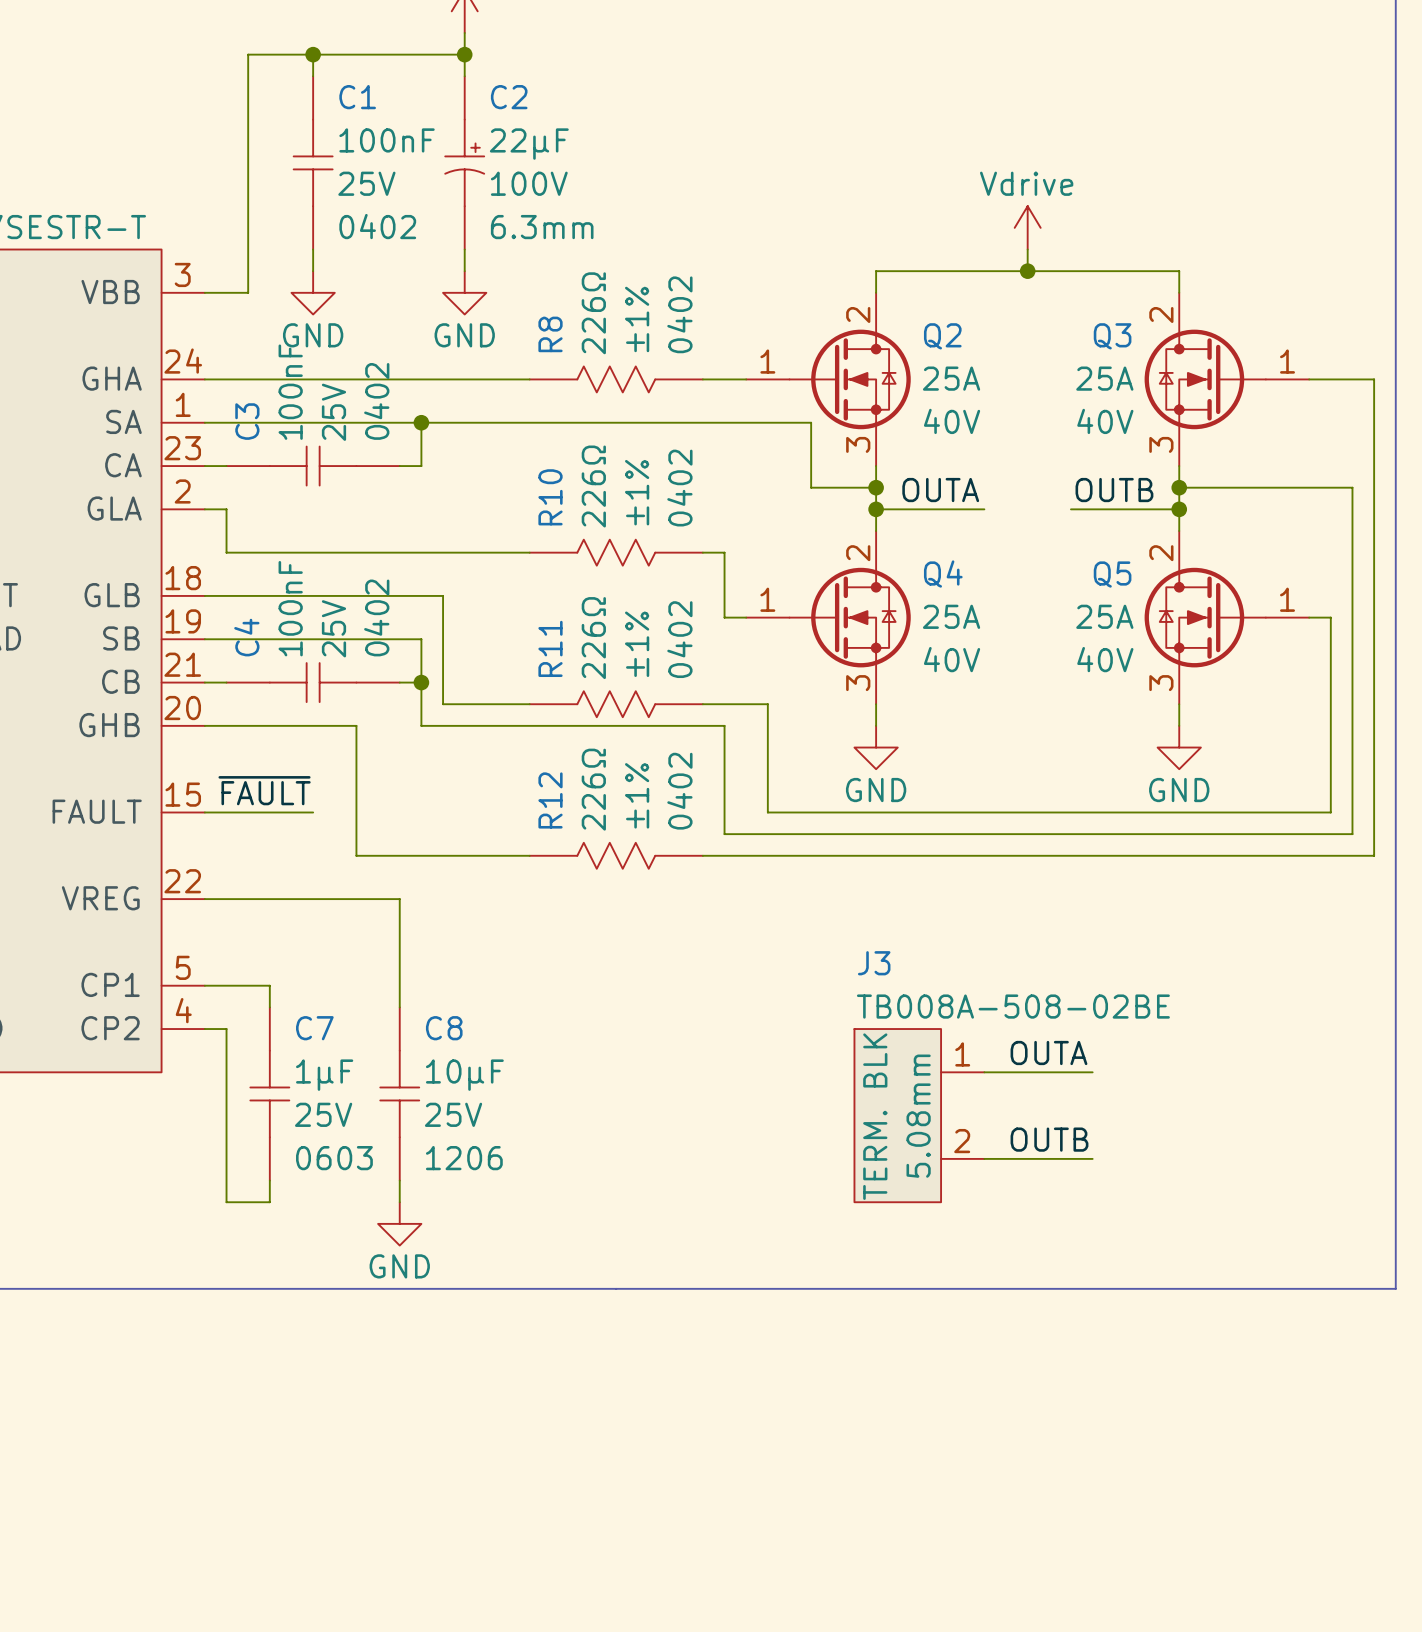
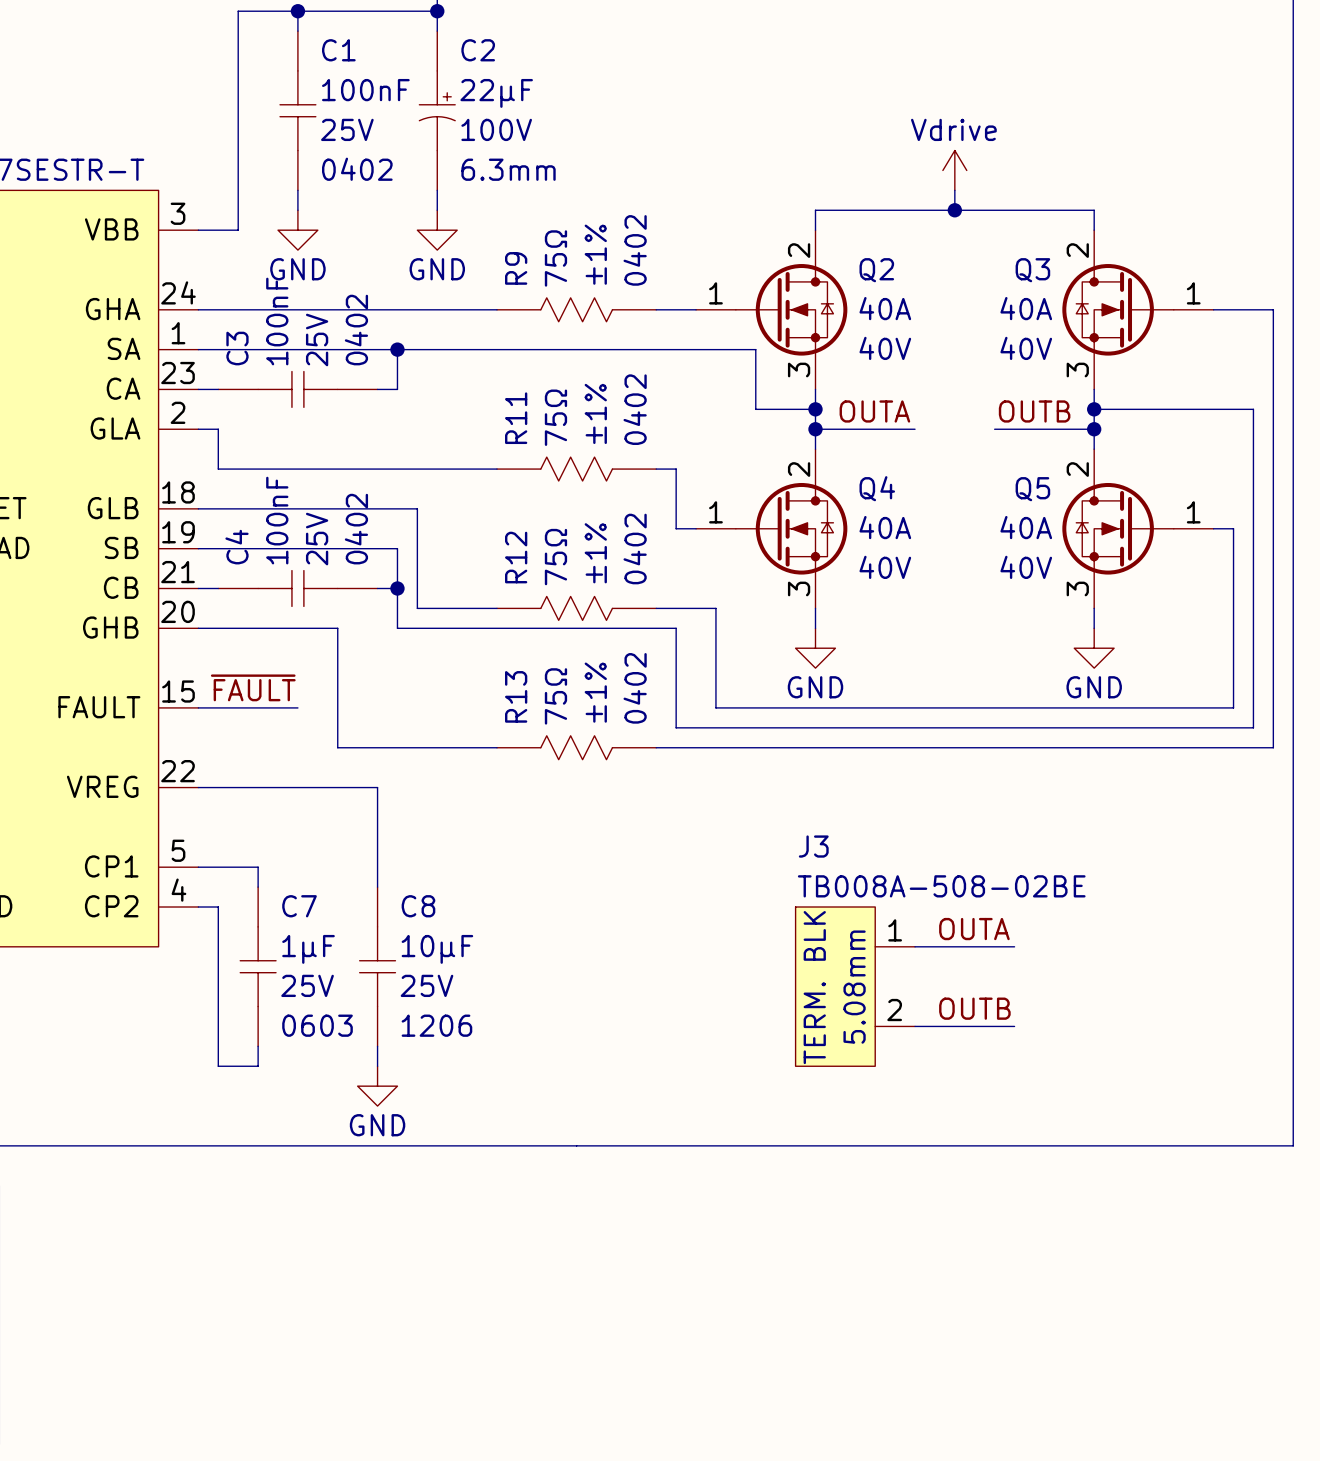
R8 text: 226Ω (593, 313) -> 75Ω (555, 258)
R8 name: R8 (550, 334) -> R9 (516, 268)
Q2 text: 25A (951, 378) -> 40A (885, 308)
Q3 text: 25A (1104, 378) -> 40A (1026, 308)
R10 text: 226Ω (593, 486) -> 75Ω (555, 417)
R10 name: R10 (550, 497) -> R11 (516, 418)
Q4 text: 25A (951, 616) -> 40A (885, 527)
Q5 text: 25A (1104, 616) -> 40A (1026, 527)
R11 text: 226Ω (593, 638) -> 75Ω (555, 557)
R11 name: R11 (550, 648) -> R12 (516, 557)
R12 text: 226Ω (593, 789) -> 75Ω (555, 696)
R12 name: R12 (550, 800) -> R13 (516, 696)

